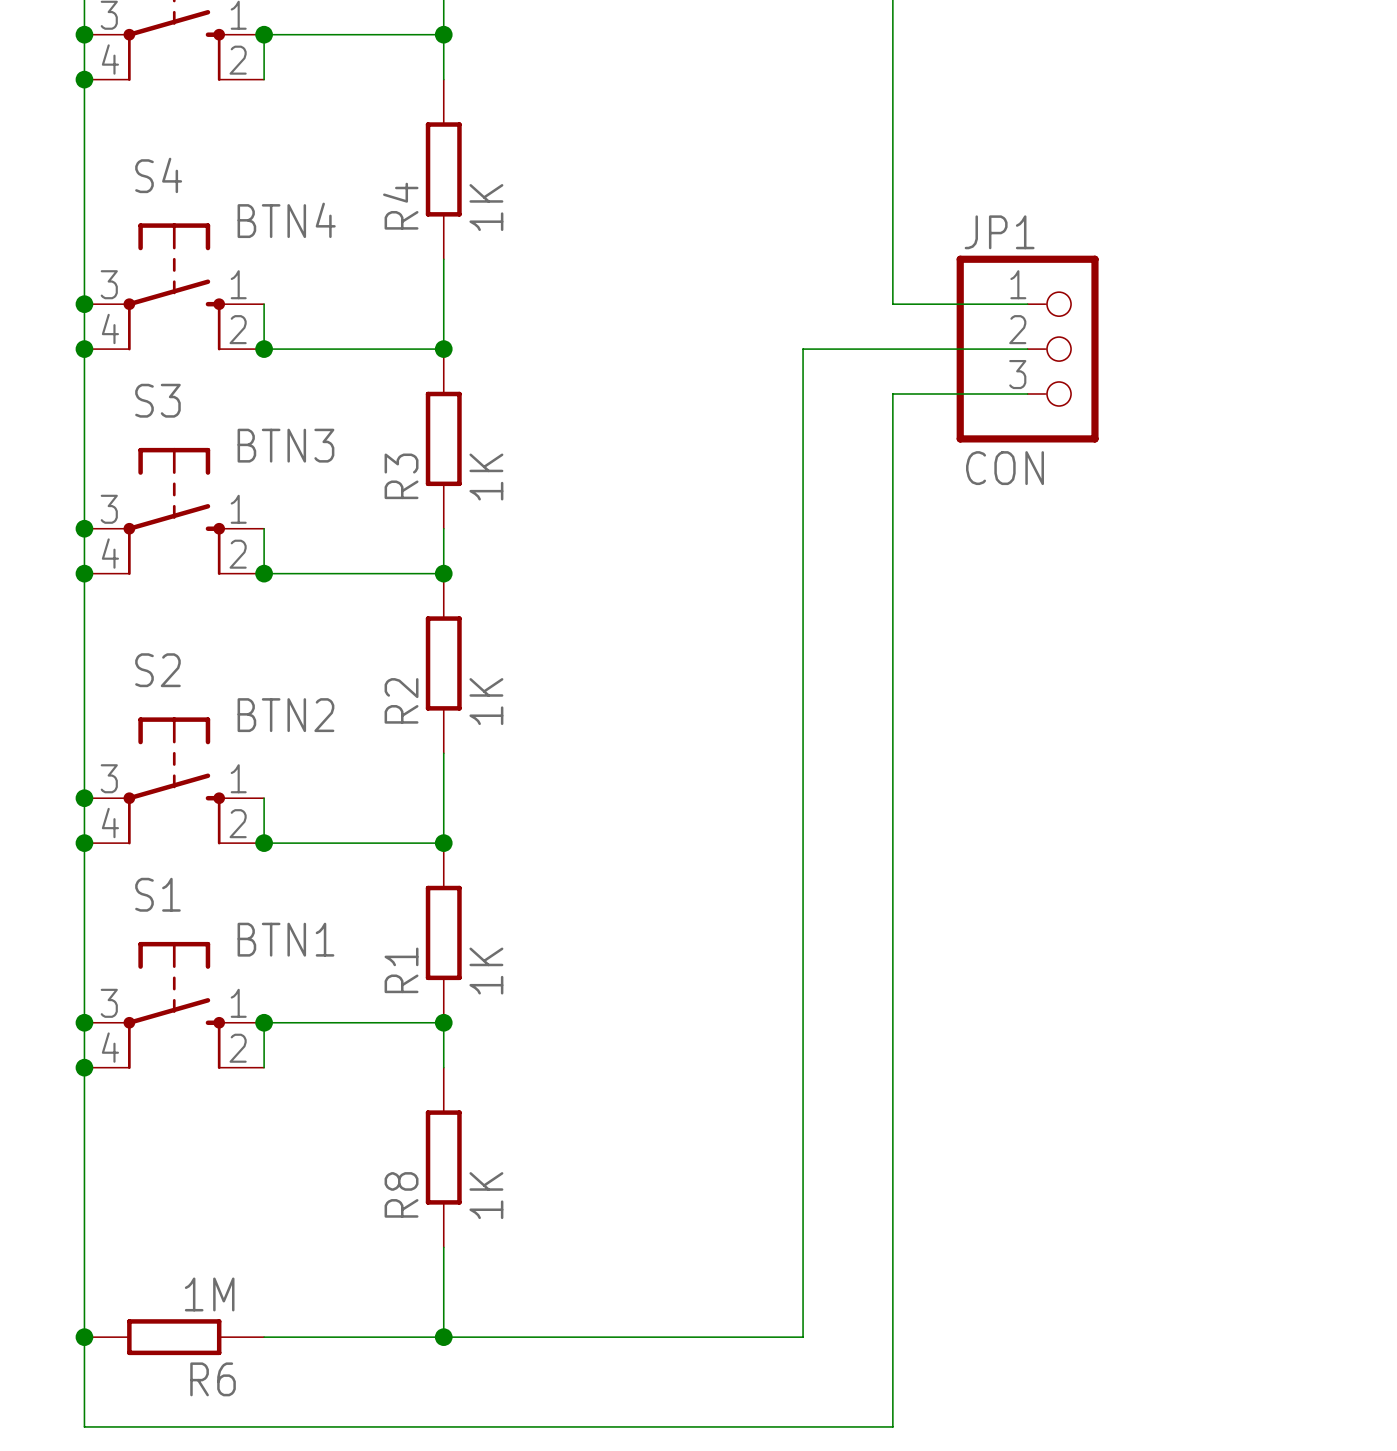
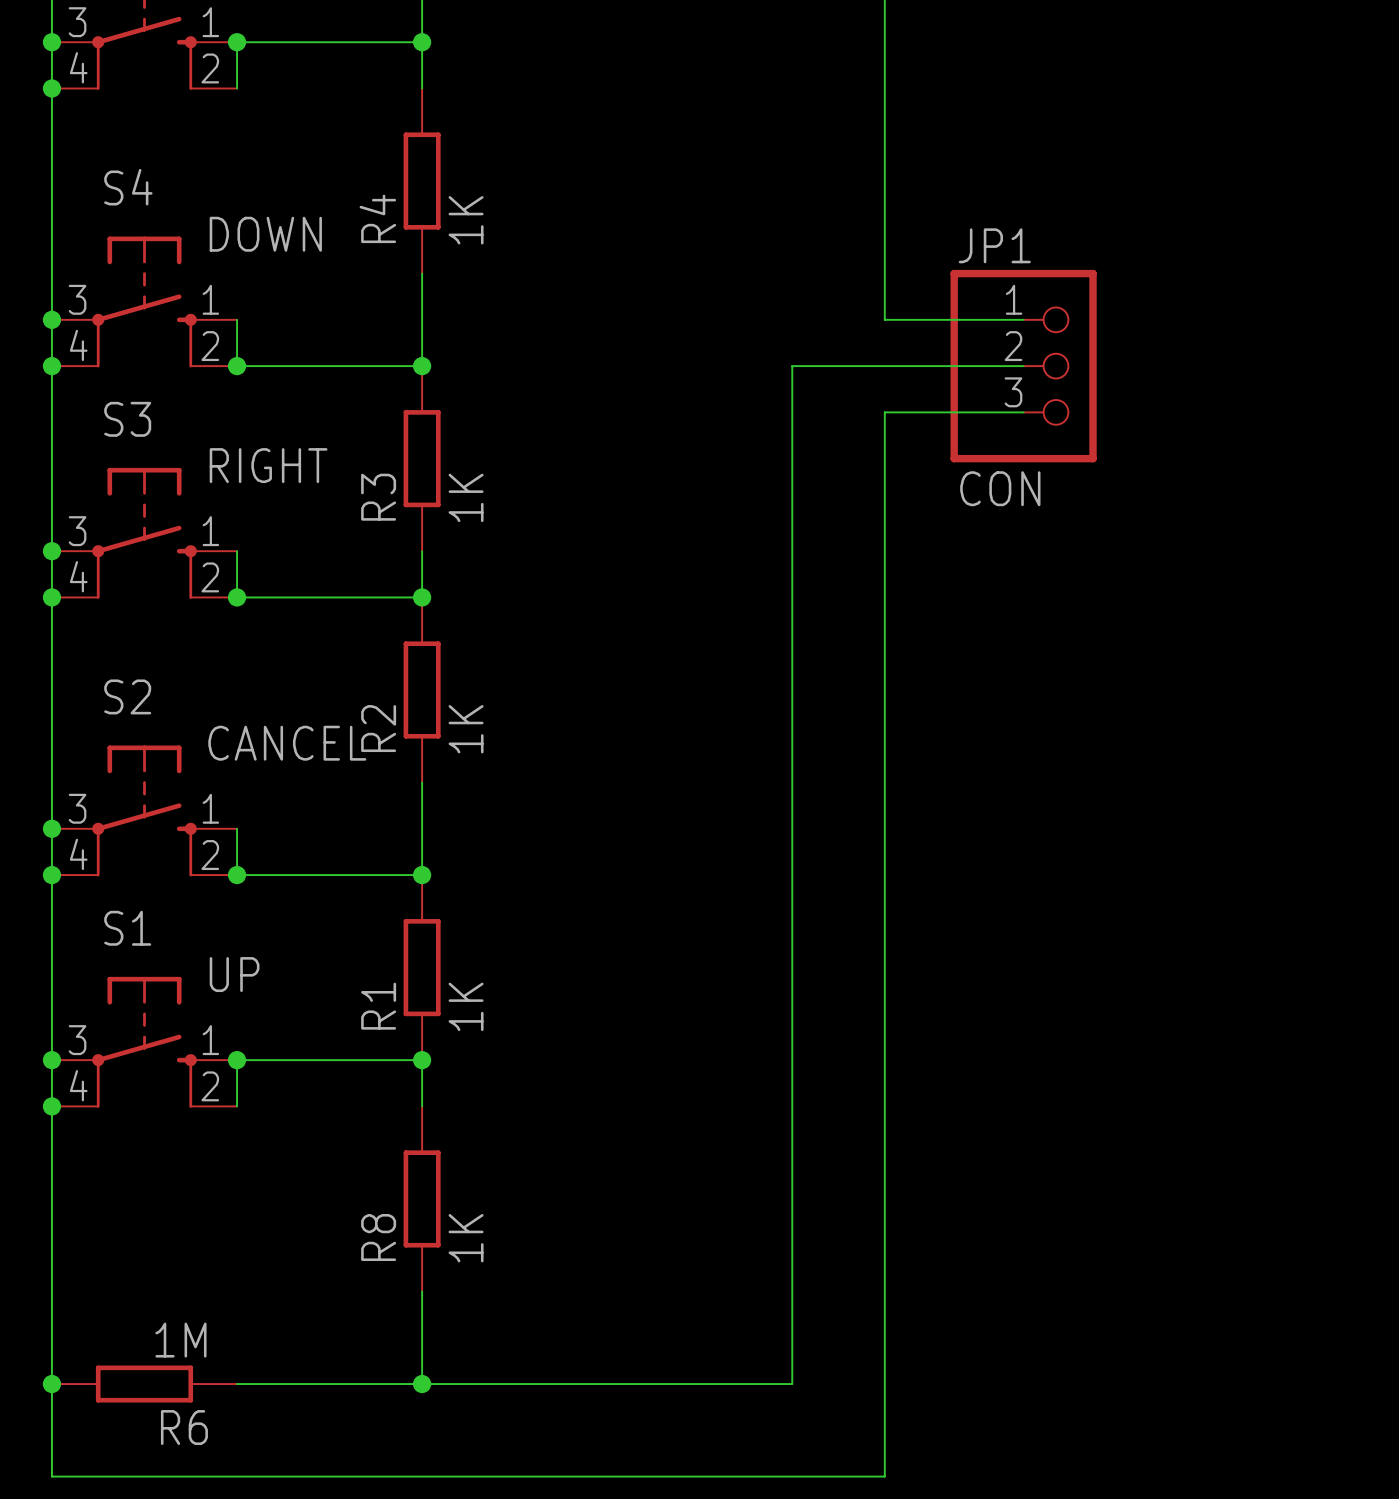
S4 value: BTN4 (286, 220) -> DOWN (265, 234)
S3 value: BTN3 (285, 445) -> RIGHT (268, 465)
S2 value: BTN2 (285, 715) -> CANCEL (287, 743)
S1 value: BTN1 (285, 939) -> UP (234, 974)

